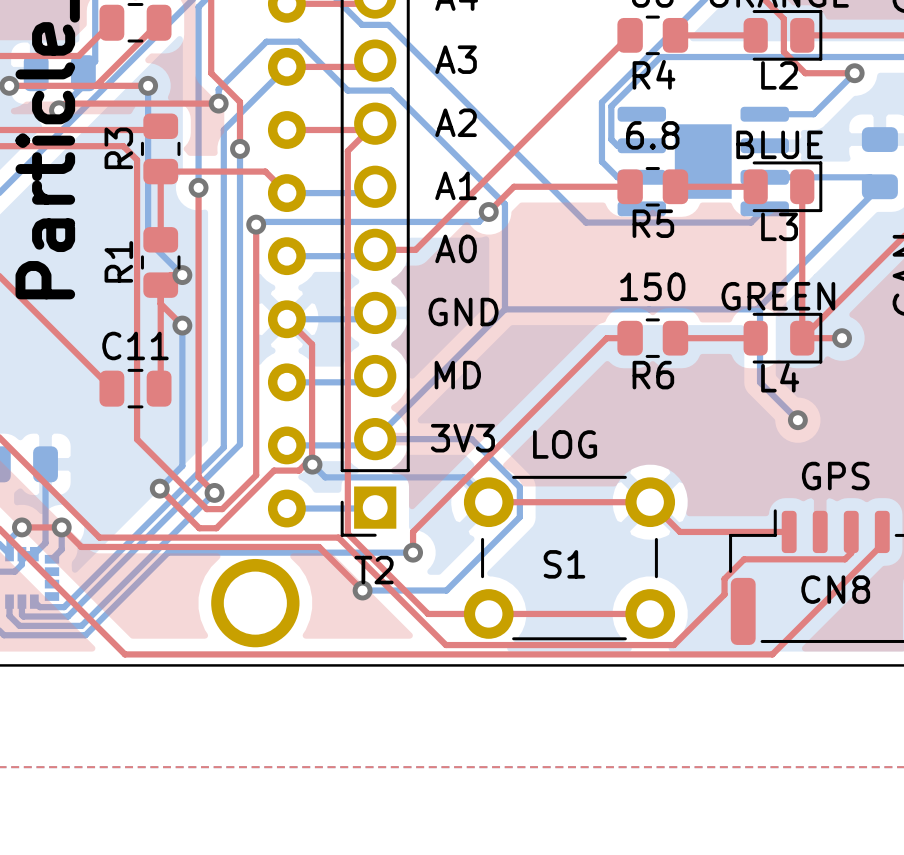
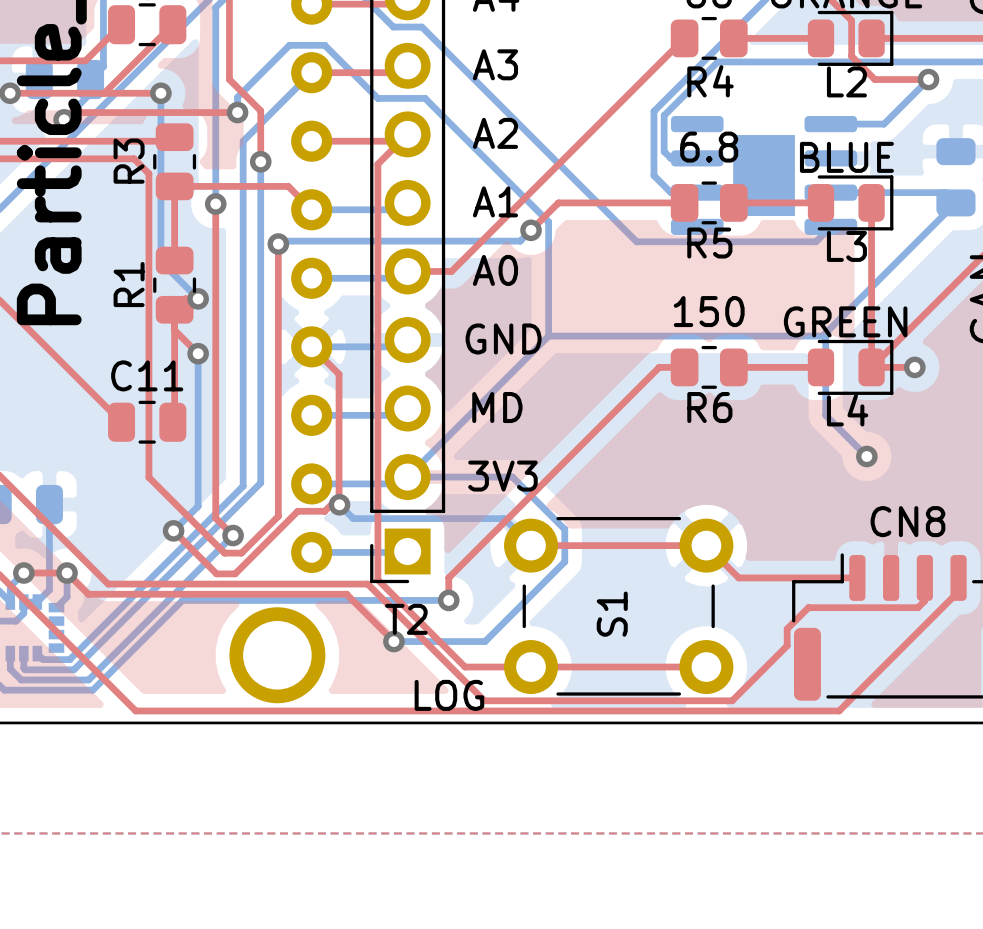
S1 value position: LOG (565, 444) -> LOG (449, 695)
CN8 value: GPS (835, 476) -> none
S1 name rotation: 0° (564, 564) -> 90° counterclockwise (612, 614)
CN8 name position: CN8 (835, 589) -> CN8 (907, 521)

